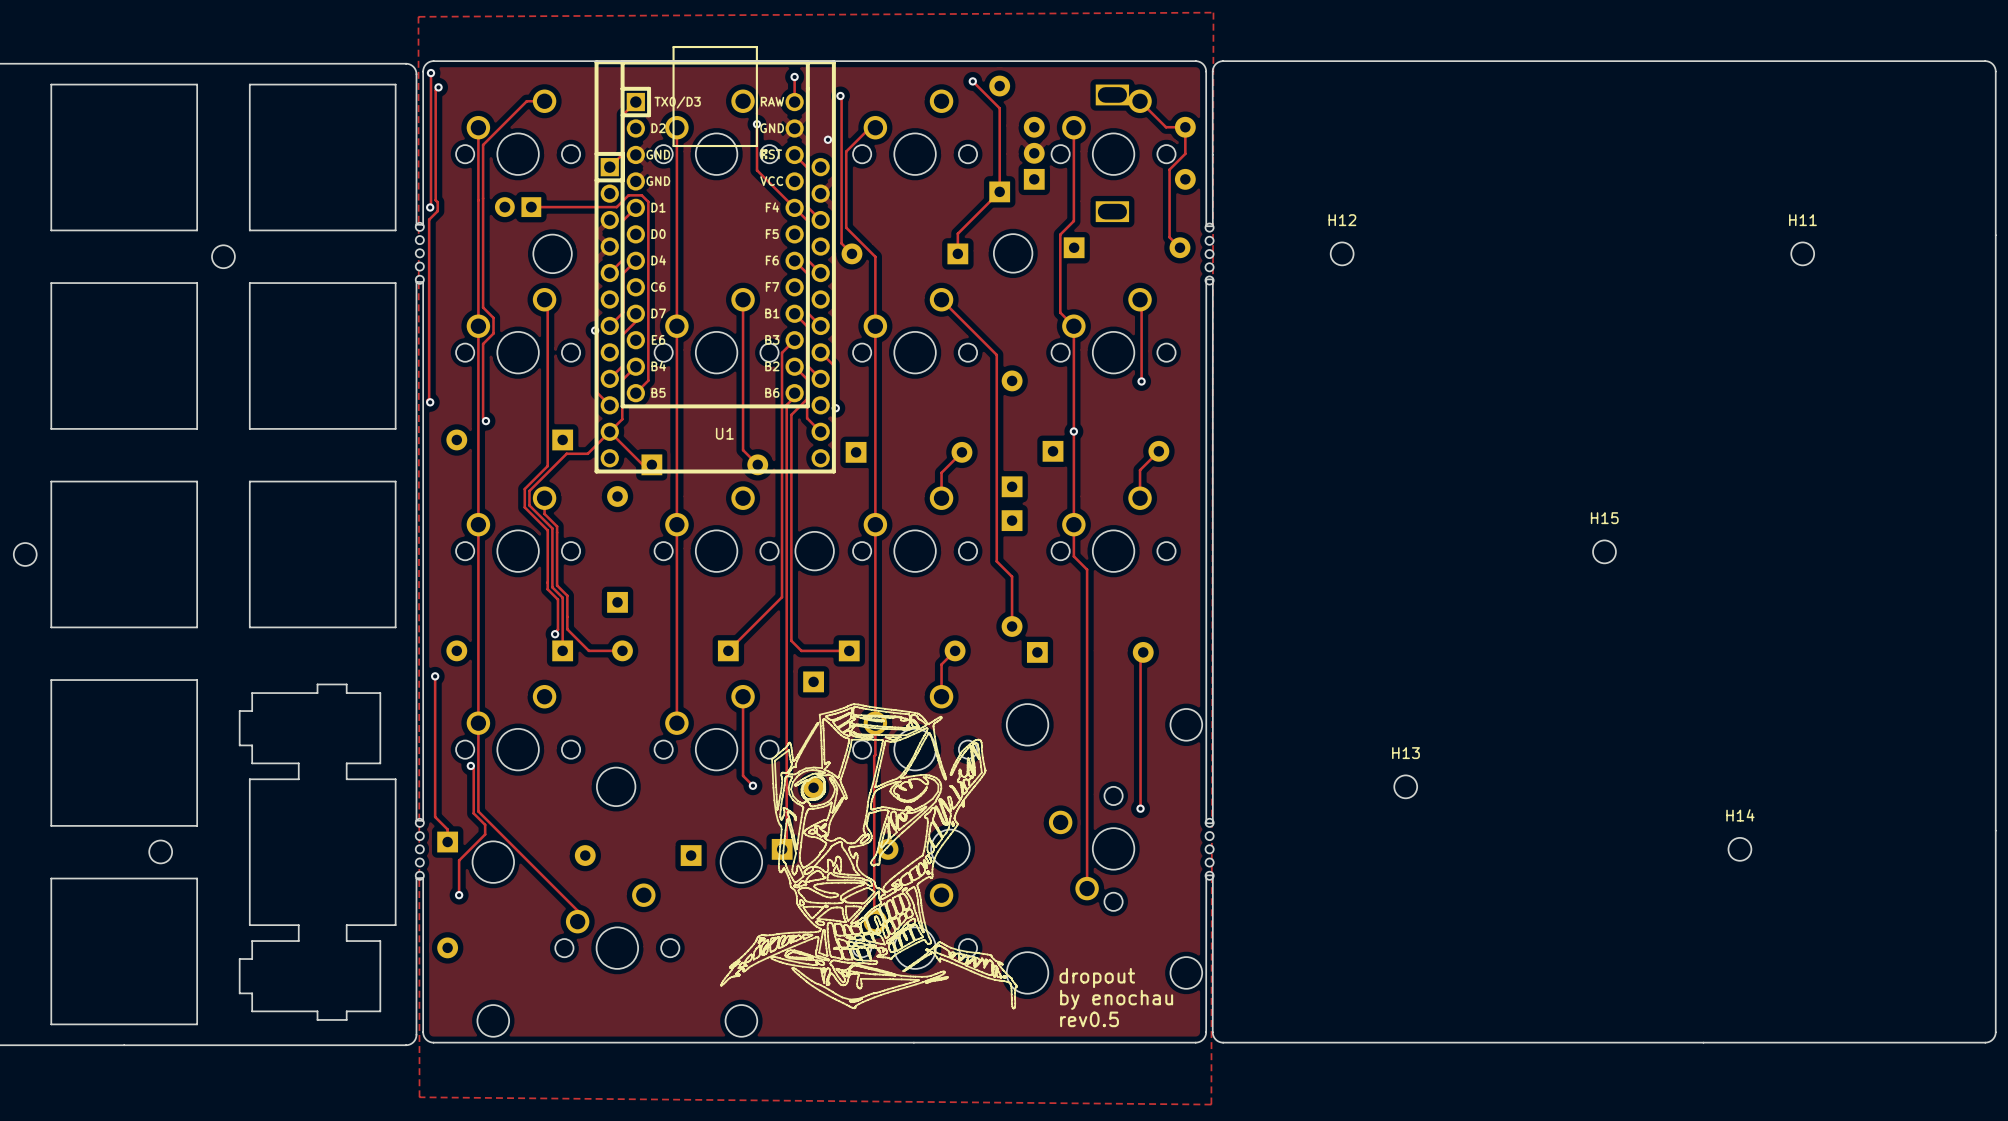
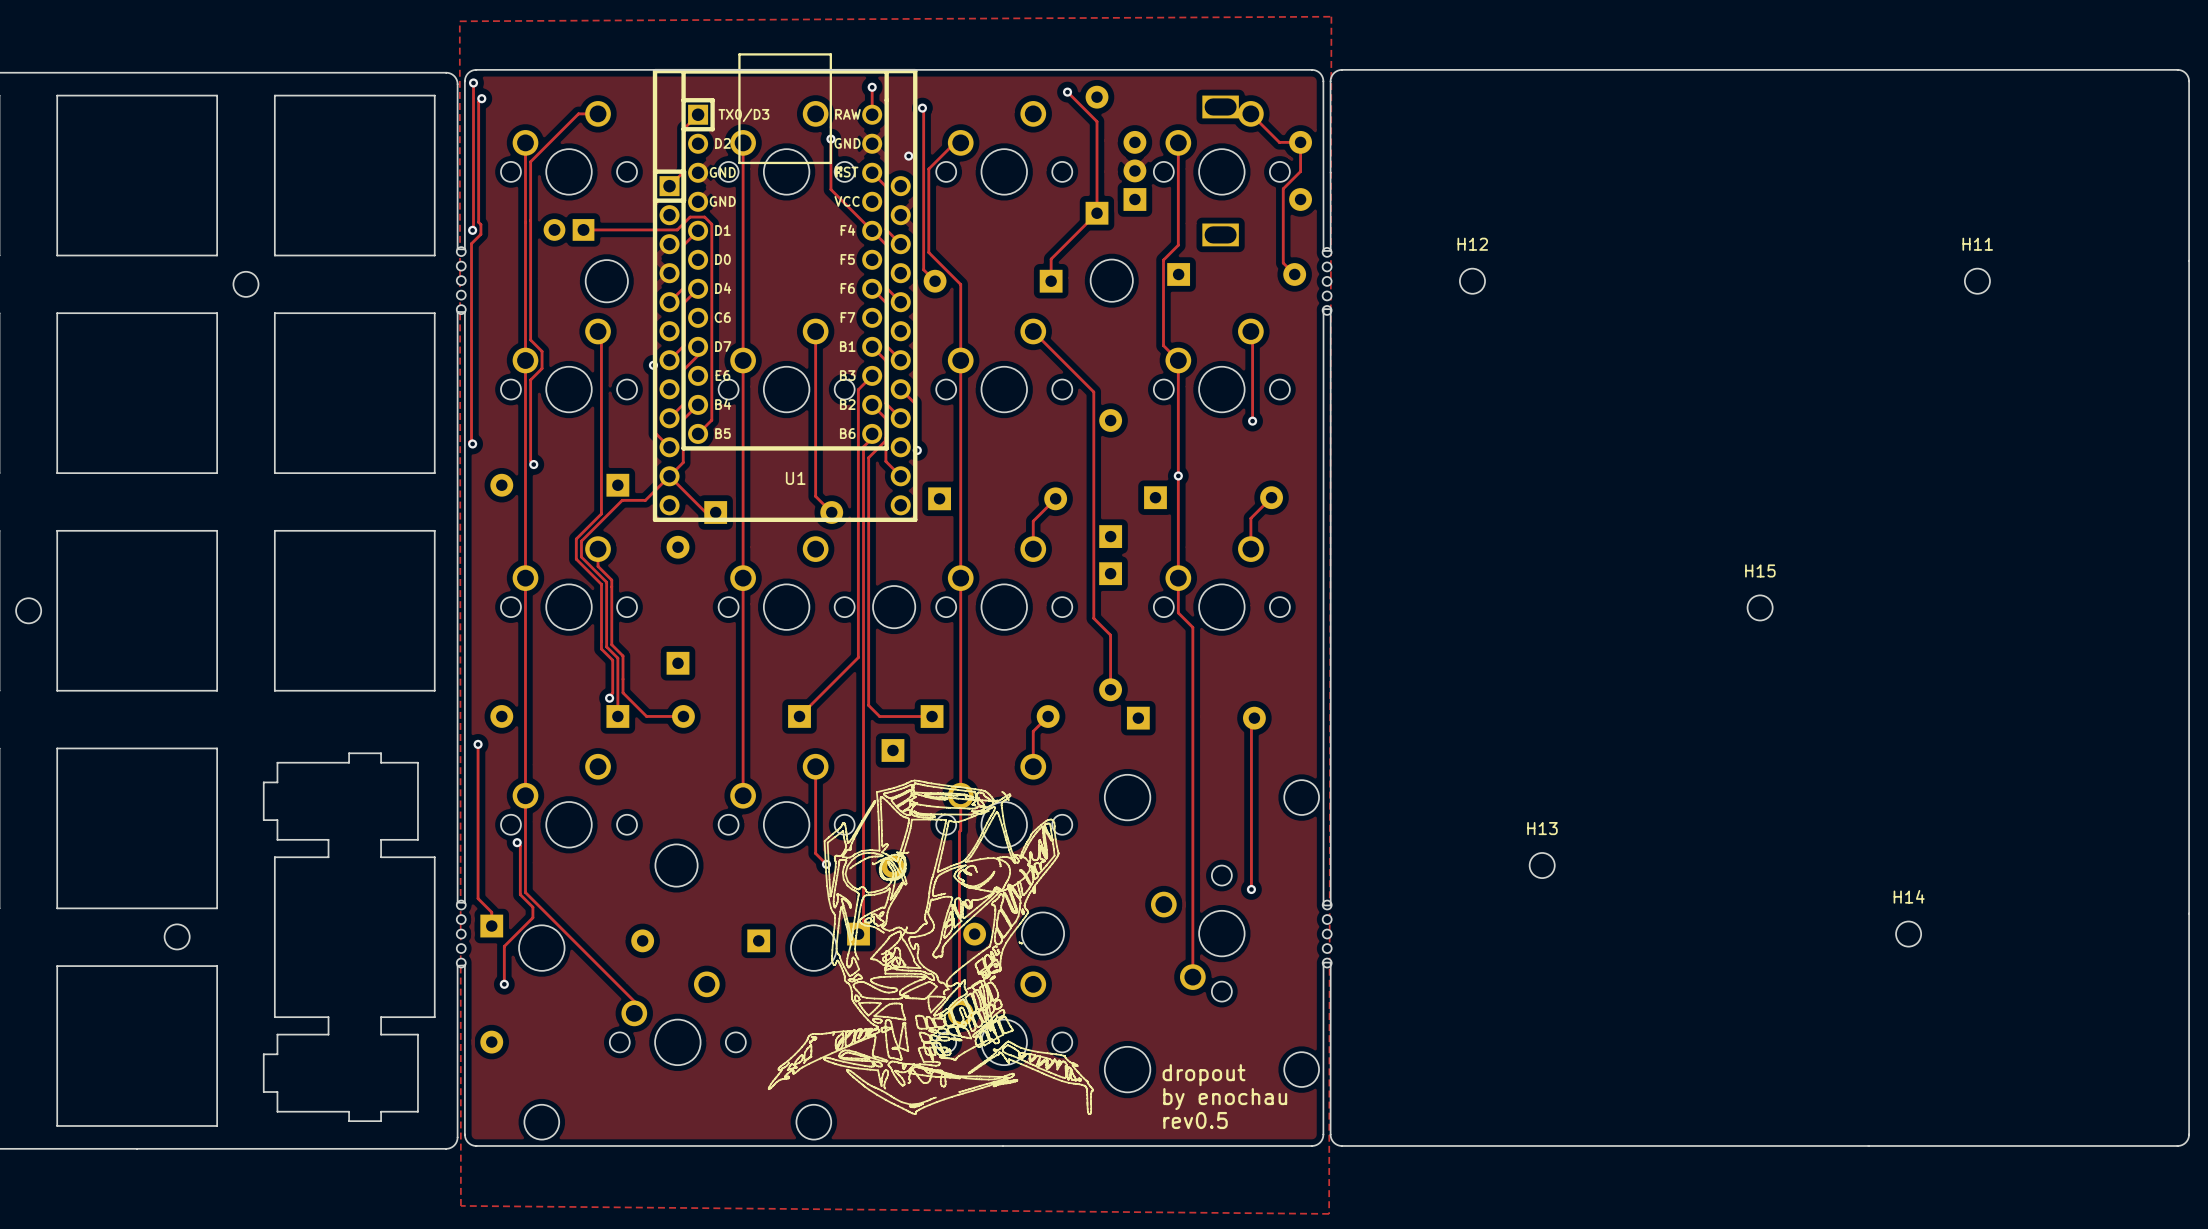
line: (850, 712) (831, 720) (826, 716) -> (910, 790) (890, 798) (884, 793)
line: (850, 713) (833, 721) (837, 727) (850, 719) (852, 708) (826, 715) -> (910, 790) (891, 799) (896, 806) (910, 797) (912, 785) (884, 793)
line: (854, 714) (854, 706) (909, 714) (909, 723) (906, 725) (909, 727) -> (914, 792) (914, 783) (974, 791) (975, 801) (972, 804) (975, 805)
line: (854, 714) (895, 716) (901, 717) (907, 719) (901, 720) (899, 717) (863, 717) (883, 720) (881, 721) (853, 716) (855, 718) (851, 722) (856, 724) -> (914, 792) (959, 793) (966, 794) (973, 797) (966, 798) (963, 795) (924, 794) (947, 798) (944, 799) (913, 794) (915, 796) (911, 800) (917, 802)
line: (824, 719) (823, 721) (824, 763) (829, 763) (824, 769) (838, 777) -> (882, 797) (880, 799) (882, 845) (887, 845) (881, 852) (897, 860)
line: (824, 719) (841, 735) (848, 738) (838, 777) -> (882, 797) (900, 814) (908, 818) (897, 860)
line: (912, 719) (917, 726) (913, 726) (911, 720) (912, 714) (916, 715) (926, 725) (906, 735) (861, 734) (853, 732) (856, 735) (872, 737) -> (979, 797) (984, 804) (979, 805) (977, 798) (978, 792) (983, 793) (993, 803) (971, 814) (922, 813) (913, 811) (917, 814) (934, 816)
line: (918, 727) (904, 729) (851, 726) (854, 726) (851, 729) (852, 735) (862, 737) (872, 737) -> (985, 806) (969, 808) (911, 804) (915, 804) (912, 808) (912, 814) (923, 817) (934, 816)
line: (926, 728) (926, 731) (912, 759) (900, 775) (875, 787) (885, 741) (899, 740) (926, 728) -> (994, 806) (994, 810) (978, 841) (965, 859) (937, 871) (949, 821) (964, 819) (994, 806)
line: (844, 732) (849, 728) (849, 721) (838, 728) (849, 735) (849, 730) (844, 732) -> (903, 811) (909, 806) (909, 800) (897, 807) (903, 813) (909, 815) (909, 809) (903, 811)
line: (928, 733) (900, 778) (926, 774) (936, 778) (940, 783) (941, 788) (935, 801) -> (996, 812) (976, 847) (965, 862) (993, 858) (1005, 861) (1009, 867) (1010, 873) (1004, 886)
line: (929, 733) (945, 779) (937, 749) (933, 726) (941, 716) (928, 724) (917, 713) (854, 704) (819, 714) (822, 768) (805, 768) (795, 774) (788, 773) (792, 767) (795, 767) (798, 757) (818, 722) (793, 760) (790, 742) -> (996, 812) (1015, 863) (1005, 830) (1001, 805) (1010, 794) (995, 802) (984, 790) (914, 780) (876, 792) (879, 850) (861, 851) (849, 857) (842, 856) (847, 850) (850, 849) (853, 838) (874, 801) (848, 842) (844, 822)
line: (789, 742) (772, 759) (775, 812) (781, 829) (778, 867) (780, 872) (783, 868) (785, 870) (790, 886) (795, 892) (799, 906) (811, 922) (820, 928) -> (843, 822) (824, 841) (828, 899) (835, 917) (832, 960) (833, 964) (837, 960) (839, 962) (845, 980) (850, 987) (854, 1002) (867, 1019) (878, 1026)
line: (960, 753) (974, 741) (980, 740) (985, 770) -> (1031, 834) (1046, 821) (1053, 820) (1058, 852)
line: (960, 753) (950, 774) -> (1031, 835) (1020, 858)
line: (978, 758) (971, 746) (974, 775) (968, 763) (968, 775) (972, 777) (969, 779) (969, 785) (968, 780) (963, 780) -> (1051, 840) (1043, 826) (1046, 858) (1040, 845) (1040, 858) (1044, 860) (1041, 862) (1040, 869) (1039, 863) (1034, 864)
line: (978, 758) (973, 746) (974, 743) (978, 745) (981, 772) (967, 789) (963, 780) -> (1051, 840) (1045, 826) (1046, 823) (1048, 823) (1050, 826) (1054, 855) (1038, 873) (1034, 864)
line: (985, 770) (961, 804) -> (1058, 853) (1032, 890)
line: (827, 774) (835, 779) (846, 798) (840, 779) (851, 739) (882, 740) (868, 797) (863, 828) (865, 834) (853, 843) (847, 842) (840, 838) (831, 841) (824, 837) (827, 834) (830, 820) (843, 798) -> (885, 857) (893, 863) (905, 884) (899, 863) (911, 819) (946, 820) (930, 883) (924, 917) (926, 923) (913, 933) (907, 932) (899, 927) (889, 930) (882, 927) (885, 923) (888, 908) (902, 883)
line: (951, 775) (962, 755) (971, 745) (973, 772) (968, 758) (966, 776) (962, 776) (959, 769) (957, 779) (958, 782) (961, 782) (966, 791) (963, 794) (961, 783) (962, 796) (953, 808) (950, 798) (948, 796) (950, 810) (941, 799) (939, 800) (946, 823) (937, 807) (935, 807) (945, 824) (947, 824) (947, 822) (941, 800) (950, 813) (946, 832) (942, 837) (933, 821) (935, 809) (932, 807) (924, 816) (927, 818) (927, 823) (922, 855) (883, 887) (885, 891) (893, 888) (895, 891) -> (1021, 858) (1033, 836) (1043, 826) (1045, 855) (1039, 839) (1037, 859) (1033, 859) (1030, 852) (1028, 863) (1029, 866) (1032, 866) (1037, 876) (1034, 879) (1032, 867) (1033, 881) (1023, 895) (1020, 883) (1018, 882) (1020, 897) (1010, 885) (1007, 885) (1015, 911) (1005, 893) (1003, 893) (1014, 912) (1016, 912) (1017, 910) (1009, 885) (1020, 900) (1015, 921) (1011, 926) (1001, 909) (1003, 896) (1000, 894) (992, 903) (995, 906) (995, 911) (989, 946) (958, 969) (946, 981) (948, 986) (957, 982) (959, 986)
line: (791, 776) (785, 777) (780, 816) (781, 819) (784, 807) (794, 815) (795, 820) (793, 815) (787, 812) -> (846, 860) (839, 861) (833, 903) (835, 907) (838, 894) (849, 902) (850, 908) (848, 902) (841, 899)
line: (791, 776) (788, 787) (789, 794) (792, 799) (803, 807) -> (846, 860) (842, 872) (843, 879) (847, 885) (858, 894)
line: (795, 784) (812, 774) (825, 772) (812, 770) (803, 772) (792, 782) (791, 789) (793, 796) (800, 802) (807, 801) (811, 806) (820, 805) (828, 801) (834, 792) (830, 778) (837, 788) (832, 812) -> (850, 868) (868, 857) (882, 855) (868, 852) (858, 855) (847, 866) (845, 874) (847, 881) (855, 888) (858, 889) (863, 887) (868, 892) (877, 891) (886, 887) (893, 877) (888, 861) (896, 873) (890, 899)
line: (911, 787) (908, 782) (905, 781) (900, 785) (905, 790) (898, 785) (893, 791) (899, 795) (897, 797) (906, 800) (915, 798) (926, 787) (917, 798) (907, 802) (900, 800) (890, 791) (892, 787) (900, 781) (877, 789) (872, 797) (871, 808) (882, 807) -> (977, 871) (974, 866) (970, 865) (965, 870) (971, 874) (966, 873) (963, 869) (958, 876) (963, 880) (962, 882) (972, 886) (981, 883) (994, 871) (983, 884) (973, 888) (965, 885) (954, 876) (956, 871) (965, 865) (940, 874) (935, 882) (933, 894) (934, 896) (945, 893)
line: (843, 797) (832, 812) -> (902, 883) (890, 899)
line: (959, 798) (954, 789) (950, 786) (959, 798) -> (1030, 884) (1025, 873) (1019, 870) (1030, 884)
line: (935, 801) (887, 846) (880, 854) (879, 864) (874, 864) -> (1004, 887) (951, 936) (943, 945) (942, 956) (937, 956)
line: (961, 804) (954, 817) (957, 824) (937, 852) (933, 864) (932, 876) (930, 877) -> (1031, 890) (1024, 905) (1028, 912) (1006, 942) (1001, 956) (1000, 969) (997, 970)
line: (963, 806) (963, 800) (963, 806) -> (1034, 892) (1034, 886) (1034, 892)
line: (803, 807) (796, 849) (787, 812) -> (858, 894) (851, 939) (841, 899)
line: (777, 809) (774, 760) (788, 750) (791, 765) (787, 772) (781, 773) (782, 782) (777, 809) -> (830, 896) (827, 842) (843, 830) (846, 847) (841, 855) (835, 856) (835, 866) (830, 896)
line: (888, 811) (877, 852) (871, 862) (874, 865) -> (952, 898) (939, 942) (933, 954) (937, 957)
line: (888, 811) (880, 810) (870, 812) -> (952, 897) (943, 897) (932, 899)
line: (894, 811) (891, 812) (890, 816) (896, 829) (896, 813) (894, 811) -> (958, 898) (955, 899) (954, 904) (960, 917) (960, 900) (958, 898)
line: (870, 812) (866, 824) (871, 838) (863, 844) (849, 847) (849, 852) (853, 857) -> (932, 899) (928, 912) (933, 927) (924, 934) (909, 937) (909, 942) (914, 949)
line: (901, 813) (904, 815) (904, 818) (900, 816) (901, 813) -> (966, 899) (970, 902) (969, 906) (965, 903) (966, 899)
line: (888, 817) (889, 826) (890, 838) (896, 832) (888, 817) -> (952, 904) (952, 914) (954, 927) (961, 921) (952, 904)
line: (952, 821) (953, 826) (952, 821) -> (1022, 909) (1023, 914) (1022, 909)
line: (825, 823) (825, 826) (822, 828) (822, 826) (825, 823) -> (882, 911) (882, 914) (879, 916) (879, 914) (882, 911)
line: (887, 823) (881, 847) (888, 839) (887, 823) -> (950, 911) (944, 937) (952, 928) (951, 911)
line: (813, 829) (814, 833) (808, 832) (809, 831) (813, 829) -> (869, 917) (871, 922) (864, 921) (865, 919) (869, 917)
line: (899, 829) (926, 806) (915, 812) (906, 813) (906, 819) (904, 820) (898, 814) (899, 829) -> (964, 918) (993, 893) (981, 899) (972, 900) (971, 907) (969, 908) (963, 901) (964, 918)
line: (820, 835) (815, 828) (816, 826) (819, 826) (826, 833) (820, 836) -> (877, 925) (874, 922) (873, 916) (871, 916) (873, 914) (876, 914) (884, 922) (877, 925)
line: (928, 838) (933, 848) (929, 853) (927, 850) (928, 838) -> (996, 928) (1002, 939) (997, 944) (994, 940) (996, 928)
line: (841, 841) (830, 847) -> (900, 931) (888, 937)
line: (841, 841) (853, 868) (859, 875) (835, 873) (833, 871) (836, 865) (839, 871) -> (900, 931) (913, 960) (920, 968) (894, 965) (892, 963) (895, 957) (899, 964)
line: (826, 842) (817, 837) (808, 836) (804, 832) (811, 826) (826, 820) (831, 802) (822, 807) (807, 810) (800, 853) (800, 860) (803, 867) -> (883, 932) (873, 926) (864, 925) (859, 921) (867, 914) (884, 907) (889, 888) (880, 893) (863, 897) (855, 943) (855, 952) (858, 959)
line: (830, 847) (814, 866) (827, 872) (828, 859) (831, 861) (833, 865) (837, 856) (840, 859) (840, 871) -> (888, 937) (871, 958) (885, 964) (886, 951) (889, 952) (891, 957) (896, 947) (899, 951) (899, 964)
line: (935, 847) (929, 837) (932, 822) (942, 838) (935, 847) -> (1003, 937) (997, 926) (1000, 910) (1011, 928) (1003, 937)
line: (929, 856) (925, 858) (928, 863) (931, 860) (930, 858) -> (996, 947) (994, 946) (993, 949) (996, 955) (999, 952) (998, 949)
line: (854, 857) (856, 853) (858, 870) (873, 880) (876, 887) (879, 888) -> (914, 949) (916, 943) (919, 962) (935, 974) (939, 981) (941, 982)
line: (923, 860) (927, 867) (923, 860) -> (991, 951) (994, 959) (990, 952)
line: (921, 863) (918, 866) (920, 875) (916, 866) (909, 871) (913, 880) (919, 877) (924, 872) (924, 868) (921, 863) -> (988, 954) (985, 958) (987, 968) (982, 958) (975, 964) (979, 973) (985, 970) (991, 965) (992, 960) (988, 954)
line: (786, 864) (782, 857) (787, 819) (796, 853) (792, 872) (795, 873) (798, 865) (803, 876) (795, 882) -> (839, 956) (836, 948) (841, 906) (850, 944) (847, 965) (848, 967) (850, 966) (853, 957) (859, 969) (850, 976)
line: (786, 864) (794, 882) -> (839, 956) (849, 976)
line: (927, 871) (927, 873) (929, 874) (929, 871) (927, 871) -> (995, 963) (994, 966) (996, 967) (996, 964) (995, 963)
line: (830, 872) (828, 875) (827, 880) (860, 880) (871, 886) (869, 880) (837, 876) (830, 872) -> (889, 965) (886, 968) (885, 973) (921, 974) (933, 980) (930, 973) (896, 969) (889, 965)
line: (929, 876) (917, 885) (924, 922) (931, 942) (927, 943) (924, 940) (922, 940) (899, 952) (891, 959) (877, 956) (886, 954) (885, 949) (883, 951) (883, 948) (878, 948) (880, 952) (877, 948) (867, 947) (871, 959) -> (997, 970) (983, 979) (991, 1019) (998, 1042) (995, 1043) (992, 1039) (989, 1039) (964, 1052) (955, 1060) (940, 1057) (949, 1054) (949, 1049) (946, 1052) (946, 1047) (941, 1048) (943, 1053) (940, 1048) (929, 1047) (933, 1060)
line: (838, 882) (821, 883) (814, 886) (819, 890) (838, 894) (835, 897) (827, 897) (806, 887) (798, 890) (806, 901) (830, 903) (844, 900) (863, 903) (874, 892) (866, 887) (841, 899) (843, 894) (863, 883) (838, 882) -> (897, 976) (878, 977) (870, 980) (876, 984) (897, 989) (893, 992) (884, 992) (862, 981) (853, 985) (862, 996) (888, 999) (900, 998) (903, 996) (924, 999) (936, 986) (928, 982) (900, 995) (902, 989) (925, 977) (897, 976)
line: (806, 884) (797, 887) (793, 885) (798, 885) -> (862, 978) (852, 981) (848, 979) (853, 979)
line: (806, 884) (802, 880) (798, 885) -> (862, 978) (858, 974) (854, 978)
line: (879, 888) (885, 894) (881, 895) (881, 899) -> (942, 982) (948, 989) (944, 990) (944, 994)
line: (800, 900) (803, 902) (802, 905) (800, 904) (800, 900) -> (855, 995) (859, 997) (857, 1001) (855, 1000) (855, 995)
line: (813, 906) (803, 907) (811, 918) (823, 907) (813, 906) -> (869, 1002) (859, 1003) (868, 1015) (880, 1003) (869, 1002)
line: (816, 922) (820, 921) (824, 923) (820, 925) (816, 922) -> (873, 1019) (877, 1018) (881, 1021) (878, 1023) (873, 1019)
line: (829, 922) (832, 923) (839, 947) (834, 948) (839, 949) (842, 958) (830, 955) (827, 929) (829, 922) -> (887, 1020) (890, 1021) (898, 1047) (892, 1048) (898, 1050) (901, 1059) (888, 1055) (885, 1027) (885, 1021) (887, 1020)
line: (845, 922) (842, 908) (840, 907) (831, 908) (817, 918) (845, 922) -> (905, 1019) (901, 1004) (899, 1003) (889, 1004) (874, 1015) (905, 1019)
line: (820, 928) (815, 932) (759, 935) (748, 950) (730, 967) (732, 967) -> (878, 1026) (872, 1030) (810, 1034) (798, 1050) (778, 1069) (781, 1069)
line: (923, 932) (913, 886) (906, 892) (912, 902) (923, 932) -> (990, 1030) (983, 987) (980, 980) (972, 987) (978, 997) (990, 1030)
line: (760, 938) (764, 938) (762, 939) -> (811, 1037) (816, 1037) (813, 1039)
line: (762, 939) (758, 941) -> (813, 1038) (810, 1042) (810, 1041)
line: (759, 945) (759, 955) (753, 959) (754, 951) (759, 945) -> (810, 1045) (810, 1056) (804, 1060) (805, 1052) (810, 1045)
line: (792, 952) (804, 955) (812, 957) (787, 956) (792, 952) -> (847, 1052) (860, 1055) (869, 1058) (841, 1057) (847, 1052)
line: (933, 952) (931, 952) -> (1001, 1053) (998, 1053)
line: (933, 952) (939, 961) (940, 958) (988, 978) (1010, 983) -> (1001, 1053) (1008, 1062) (1009, 1059) (1062, 1081) (1085, 1086)
line: (949, 952) (939, 945) (934, 949) (937, 952) (965, 964) -> (1058, 1060) (1057, 1062) (1058, 1065) (1060, 1061) (1058, 1060)
line: (949, 952) (951, 957) (956, 953) (964, 954) (960, 959) (959, 954) (960, 960) (966, 955) (977, 958) (979, 961) (975, 965) (975, 958) -> (1019, 1053) (1021, 1058) (1027, 1054) (1035, 1055) (1031, 1061) (1029, 1055) (1030, 1061) (1037, 1055) (1050, 1059) (1051, 1062) (1047, 1067) (1047, 1059)
line: (952, 952) (950, 953) (950, 955) (954, 953) (952, 952) -> (1022, 1052) (1020, 1053) (1020, 1056) (1024, 1054) (1022, 1052)
line: (931, 953) (903, 971) (928, 952) (926, 949) (930, 949) (939, 942) (958, 949) (991, 955) (1002, 964) (998, 963) (1011, 978) (1016, 987) -> none
line: (751, 954) (747, 958) (745, 962) (751, 959) (751, 954) -> (802, 1054) (797, 1059) (794, 1063) (801, 1060) (802, 1054)
line: none -> (1019, 1052) (1007, 1045) (1002, 1049) (1005, 1053) (1036, 1066)
line: none -> (999, 1053) (968, 1073) (995, 1052) (994, 1049) (998, 1049) (1008, 1041) (1028, 1050) (1065, 1056) (1070, 1062) (1077, 1065) (1072, 1064) (1087, 1081) (1092, 1090)
line: (829, 959) (816, 955) (817, 937) (768, 957) (743, 971) (742, 968) (735, 974) (739, 975) (730, 977) (721, 985) (733, 967) -> (887, 1060) (873, 1056) (874, 1035) (820, 1058) (793, 1073) (792, 1070) (784, 1076) (788, 1077) (778, 1080) (768, 1089) (782, 1068)
line: (829, 959) (794, 950) (788, 950) (785, 955) (790, 958) (821, 961) (824, 964) (819, 964) (815, 961) -> (887, 1061) (849, 1050) (842, 1051) (839, 1055) (844, 1059) (878, 1062) (881, 1065) (876, 1065) (872, 1062)
line: (870, 959) (866, 948) (859, 947) (862, 960) (877, 962) (873, 964) (854, 963) (901, 975) (927, 976) (944, 972) (922, 982) (874, 997) (855, 1006) -> (933, 1060) (927, 1048) (920, 1047) (918, 1049) (923, 1061) (940, 1063) (935, 1065) (914, 1064) (966, 1078) (994, 1079) (1012, 1073) (1013, 1075) (989, 1085) (936, 1102) (915, 1112)
line: (975, 959) (974, 967) (981, 958) (984, 967) (989, 960) (992, 963) (993, 966) (992, 964) -> (1047, 1060) (1046, 1068) (1054, 1059) (1057, 1069) (1062, 1061) (1066, 1064) (1067, 1068) (1066, 1066)
line: (985, 959) (987, 960) (985, 963) (984, 961) (985, 959) -> none
line: (833, 960) (853, 962) (845, 970) (836, 968) (844, 978) (843, 982) (830, 963) (833, 960) -> (892, 1061) (914, 1064) (905, 1072) (895, 1070) (904, 1081) (903, 1085) (888, 1064) (892, 1061)
line: (739, 961) (733, 966) -> (789, 1062) (782, 1068)
line: (815, 961) (817, 964) (813, 964) (774, 956) (771, 958) (786, 963) (820, 968) (824, 982) (825, 971) (828, 968) (830, 970) (827, 985) -> (872, 1062) (874, 1066) (869, 1066) (827, 1057) (823, 1059) (840, 1065) (878, 1070) (881, 1086) (883, 1073) (886, 1070) (888, 1072) (884, 1084) (885, 1088)
line: (742, 962) (738, 968) (746, 966) (742, 962) -> (792, 1063) (787, 1070) (796, 1067) (792, 1064)
line: (965, 964) (968, 955) (967, 963) (972, 959) (966, 965) (991, 975) (992, 964) -> (1036, 1065) (1040, 1056) (1038, 1064) (1044, 1060) (1037, 1067) (1064, 1077) (1066, 1066)
line: (855, 965) (879, 971) (895, 975) (849, 970) (855, 965) -> (916, 1067) (942, 1073) (959, 1078) (909, 1072) (916, 1067)
line: (995, 965) (997, 968) (1001, 977) (997, 976) (996, 967) (994, 976) (995, 965) -> (1069, 1067) (1071, 1069) (1076, 1080) (1071, 1079) (1070, 1069) (1068, 1079) (1069, 1067)
line: (792, 967) (842, 997) (858, 998) (873, 993) -> (847, 1069) (867, 1083) (901, 1102) (910, 1104) (919, 1103) (935, 1097)
line: (792, 968) (819, 990) (852, 1007) (855, 1006) -> (846, 1069) (859, 1082) (876, 1094) (912, 1113) (915, 1112)
line: (1005, 976) (1003, 977) (1006, 977) -> (1081, 1079) (1078, 1079) (1081, 1079)
line: (947, 977) (933, 979) (926, 982) (947, 978) -> (1016, 1080) (1001, 1082) (993, 1086) (1016, 1080)
line: (1010, 983) (1013, 1008) (1016, 987) -> (1085, 1086) (1089, 1114) (1092, 1090)
line: (861, 998) (849, 1001) (854, 1002) (861, 998) -> (922, 1103) (909, 1106) (914, 1107) (922, 1103)

